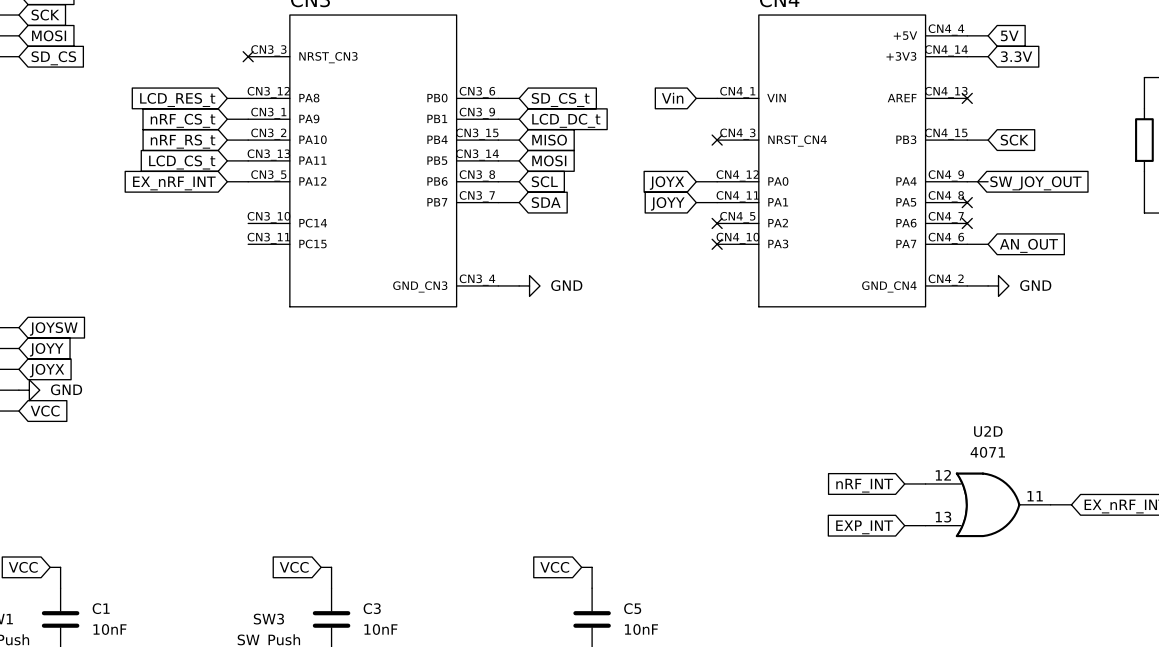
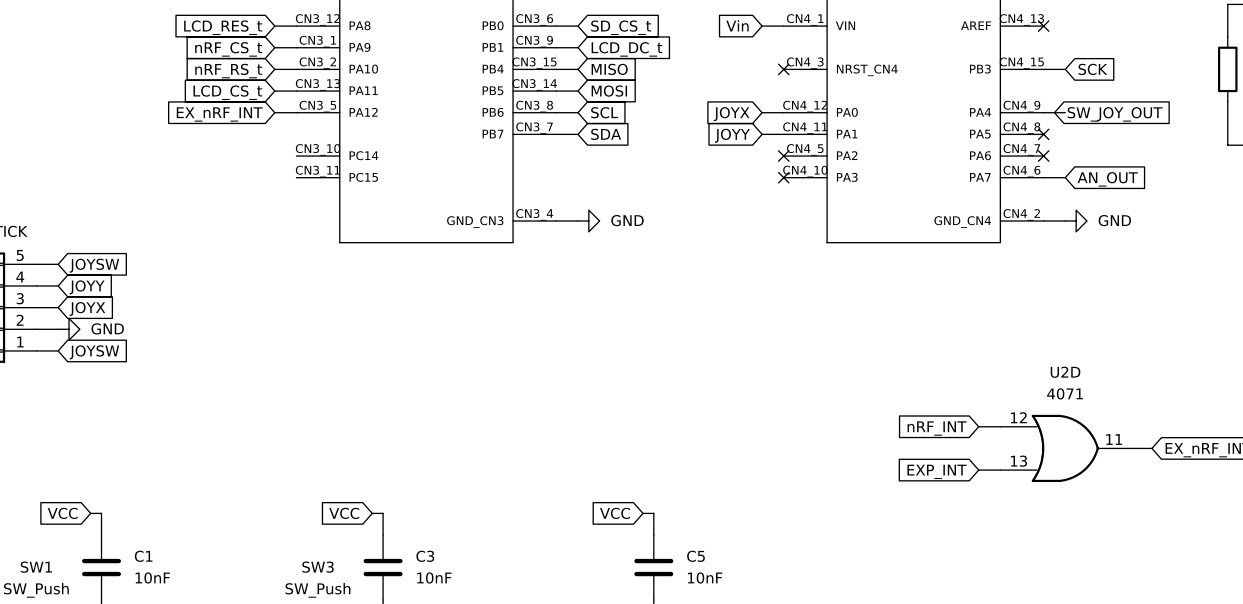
global label: VCC (45, 411) -> JOYSW (94, 352)

